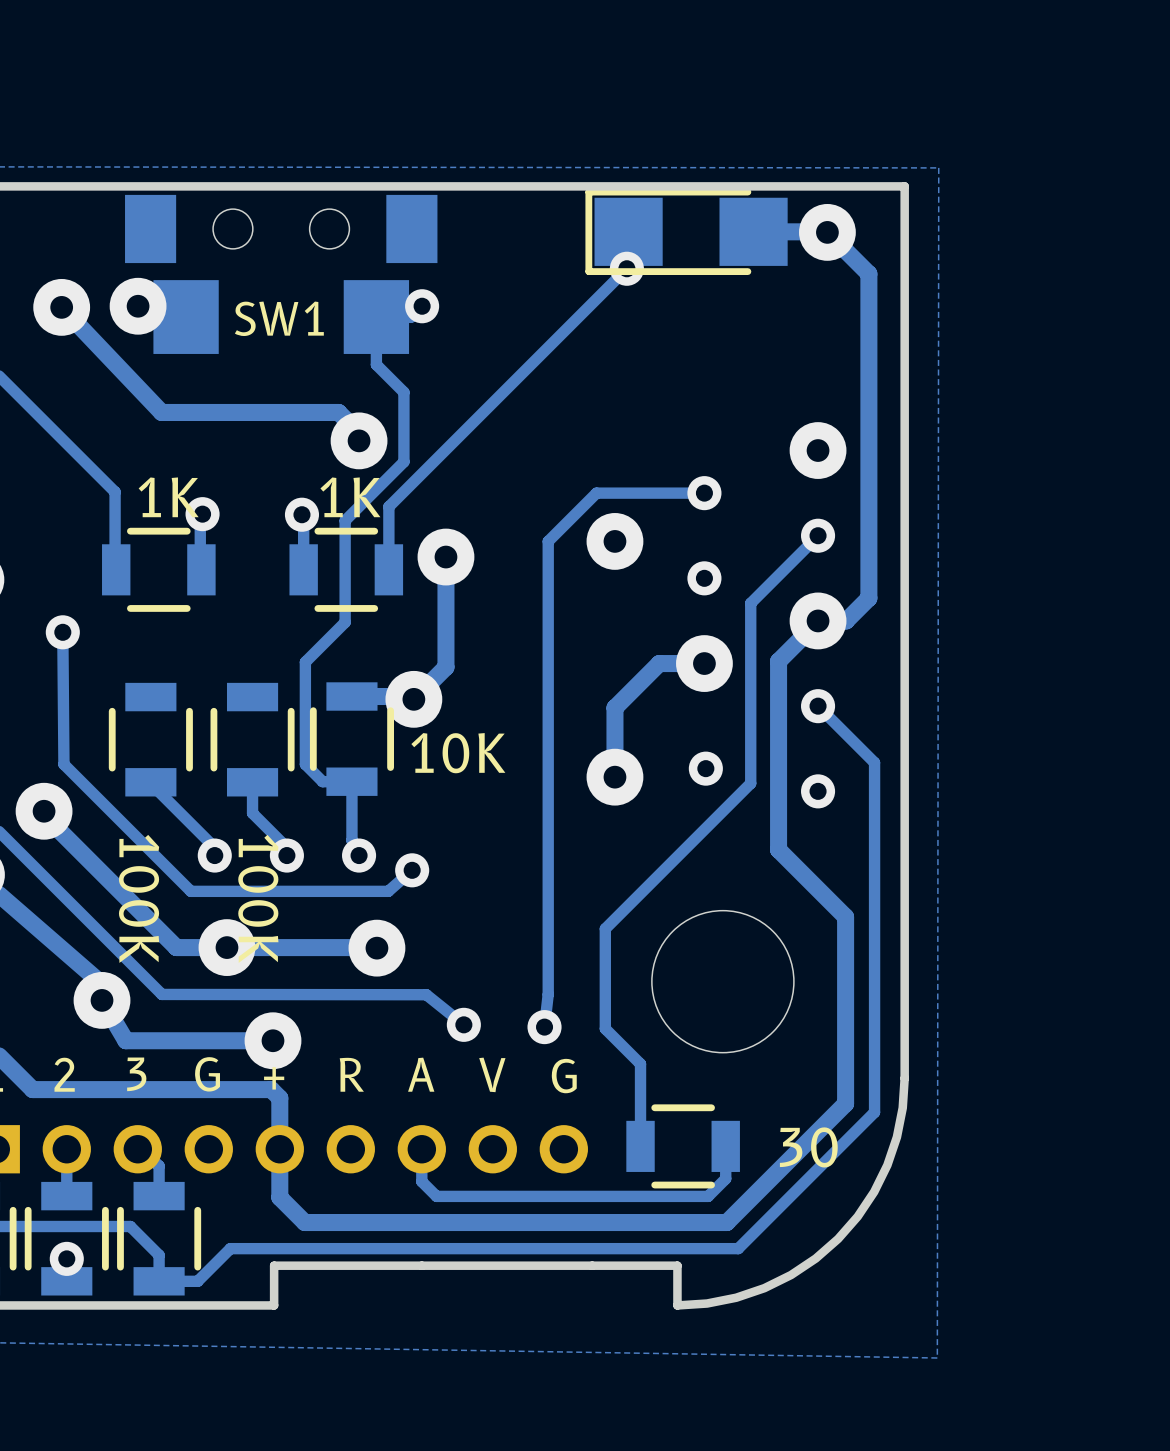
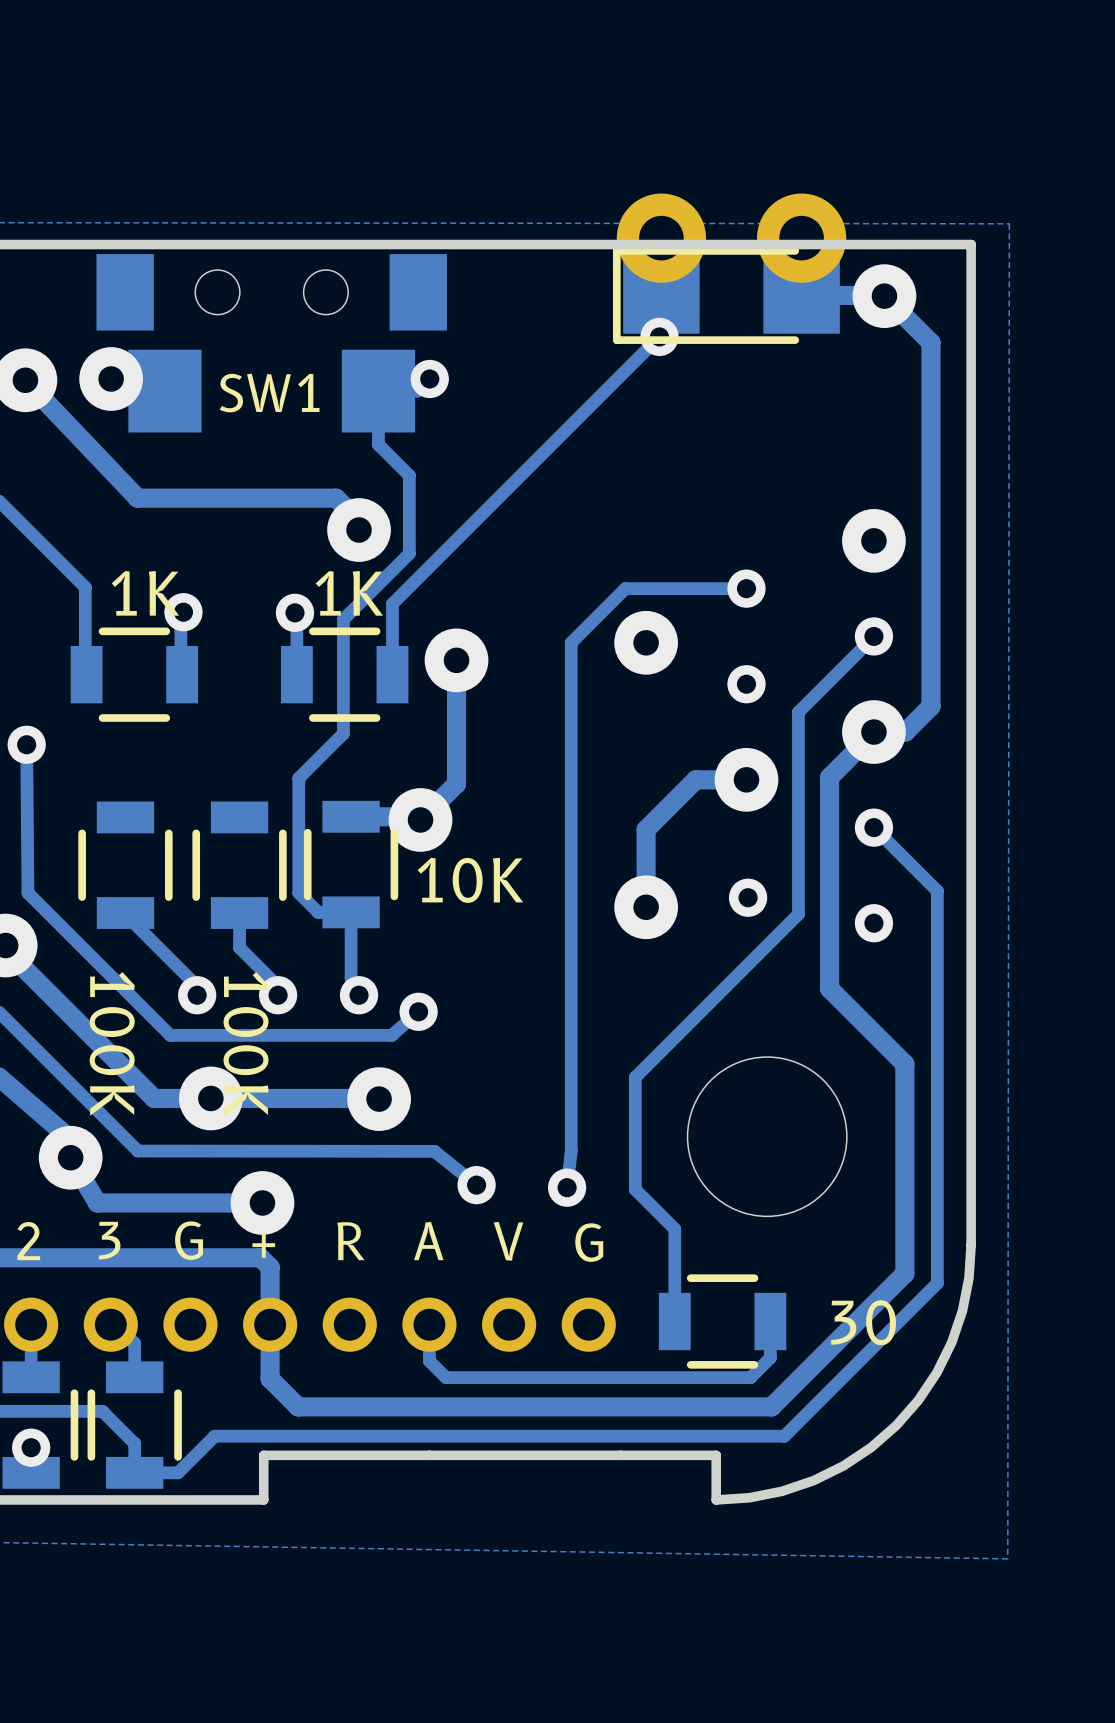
part: none -> (661, 238)
part: none -> (801, 238)

